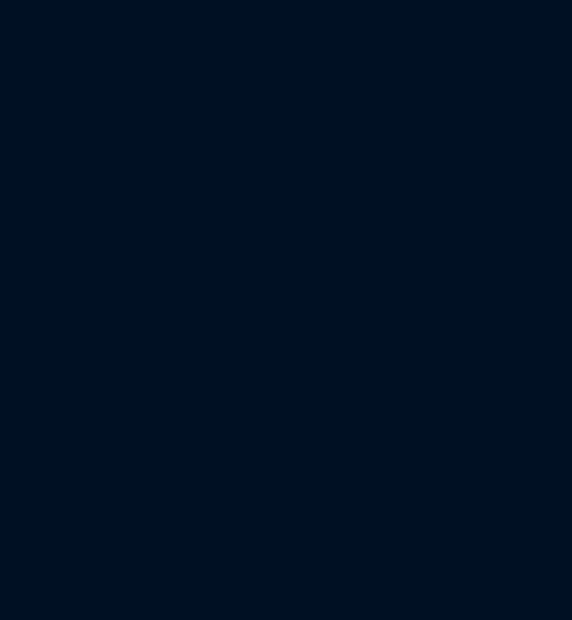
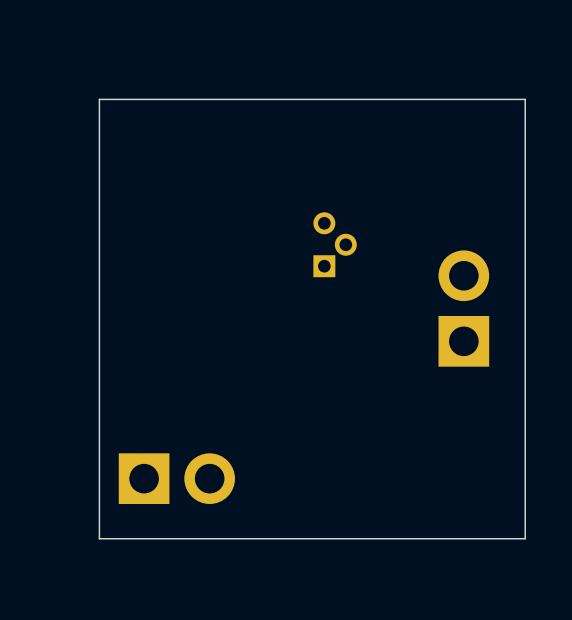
board edge: none -> (525, 99) (525, 538) (99, 538) (99, 99) (525, 99)
part: none -> (335, 244)
part: none -> (463, 308)
part: none -> (176, 478)

